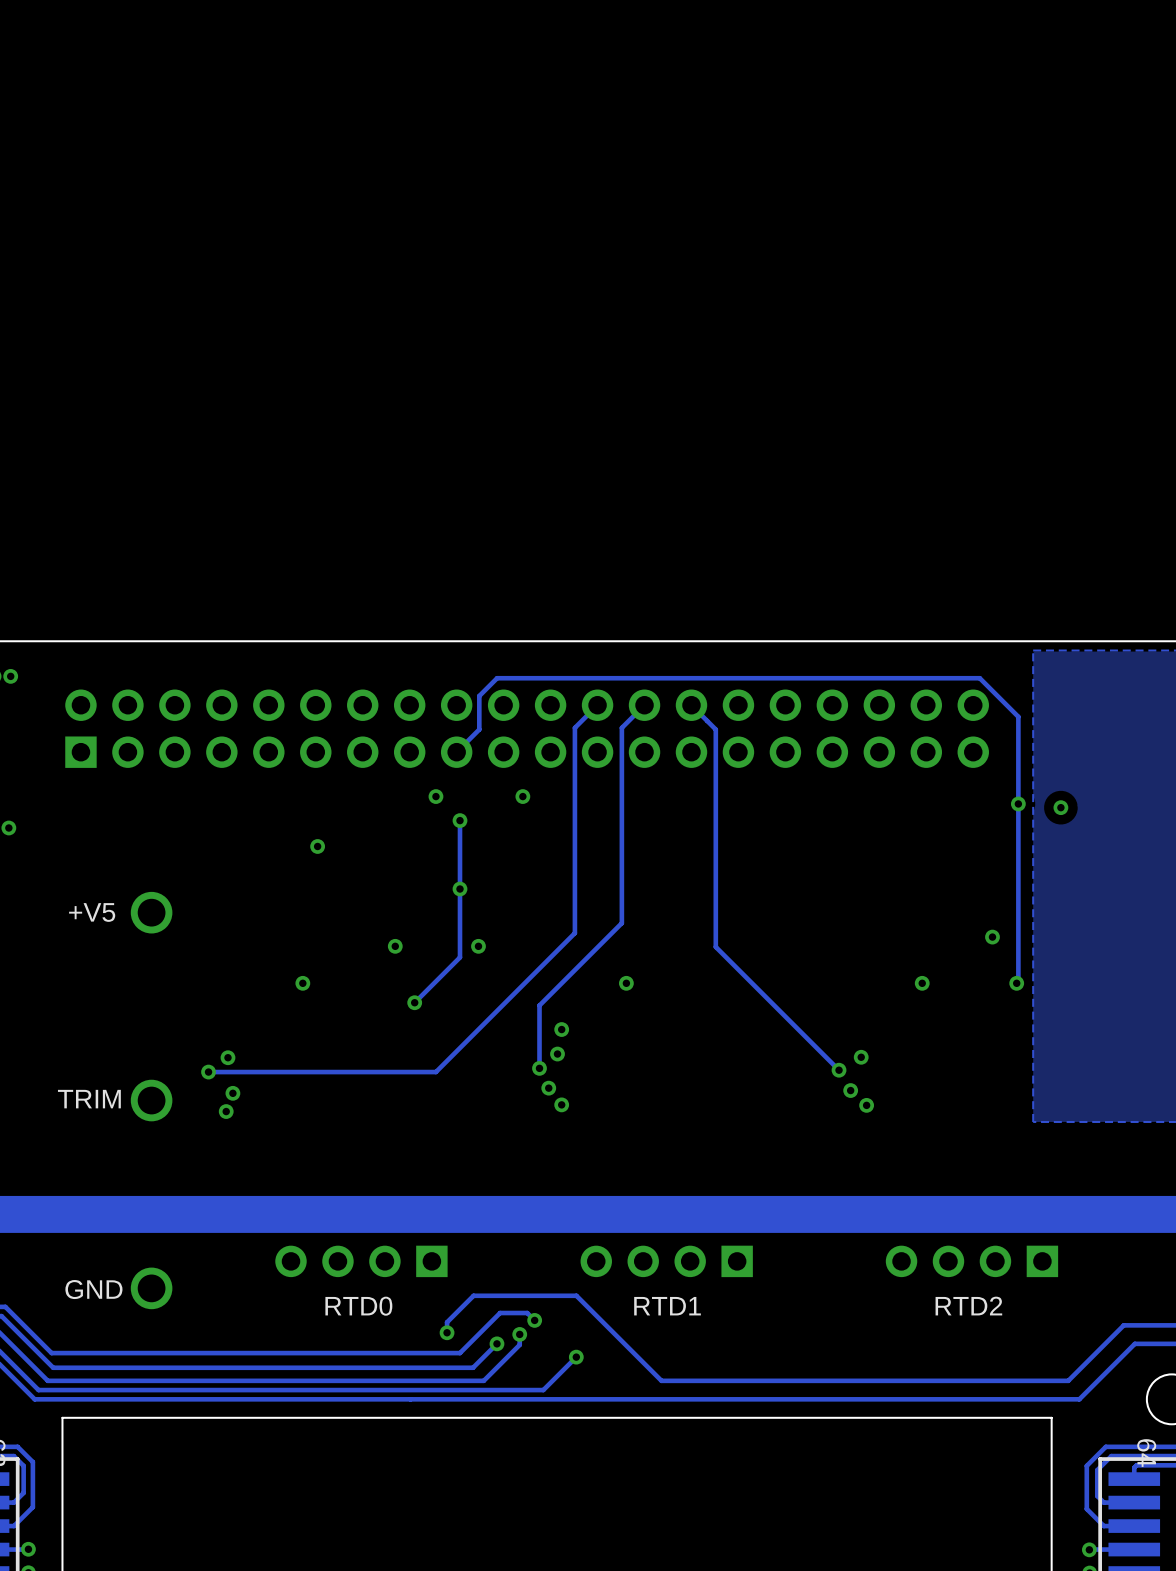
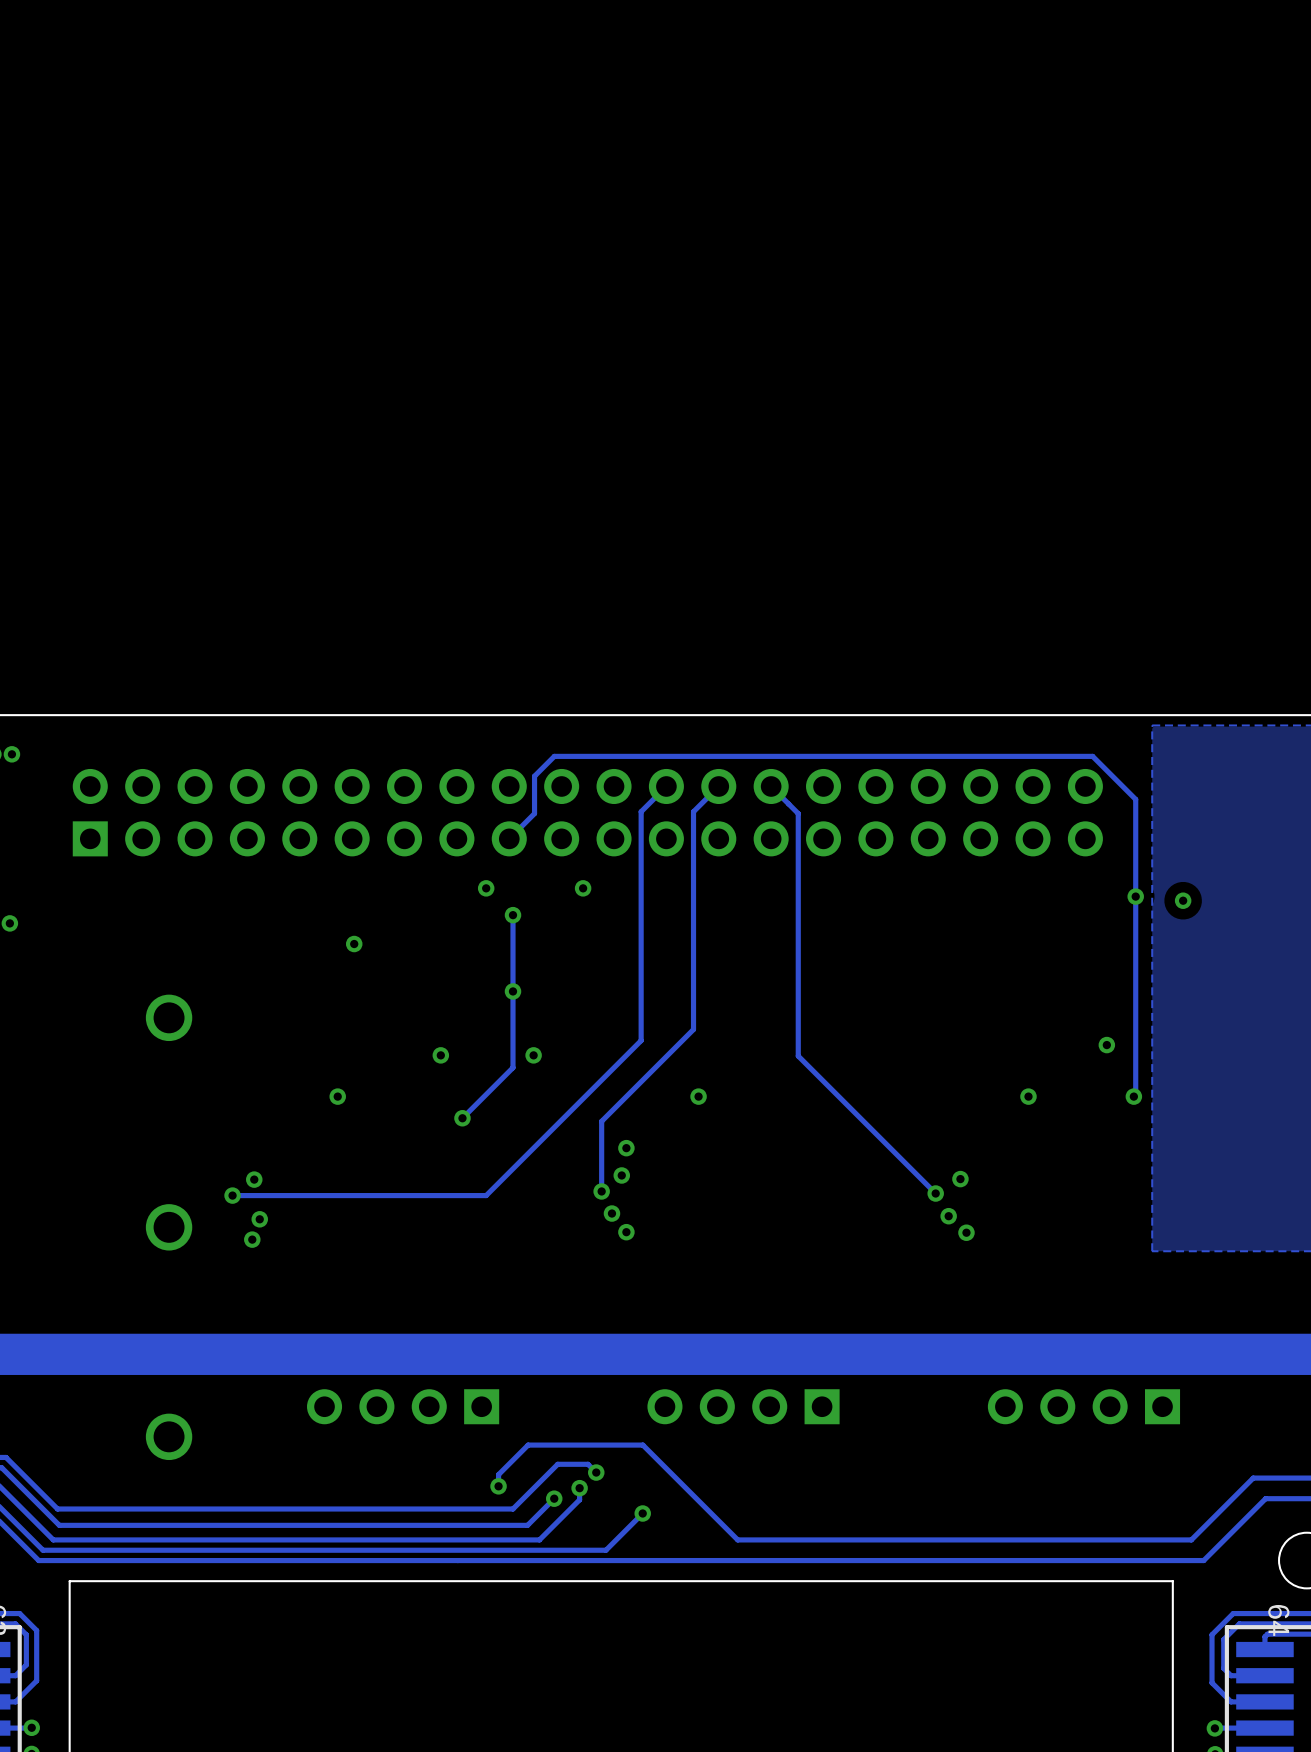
text: +V5 (92, 912) -> none
text: TRIM (89, 1099) -> none
text: GND (93, 1289) -> none
text: RTD0 (358, 1306) -> none
text: RTD1 (667, 1306) -> none
text: RTD2 (968, 1306) -> none

